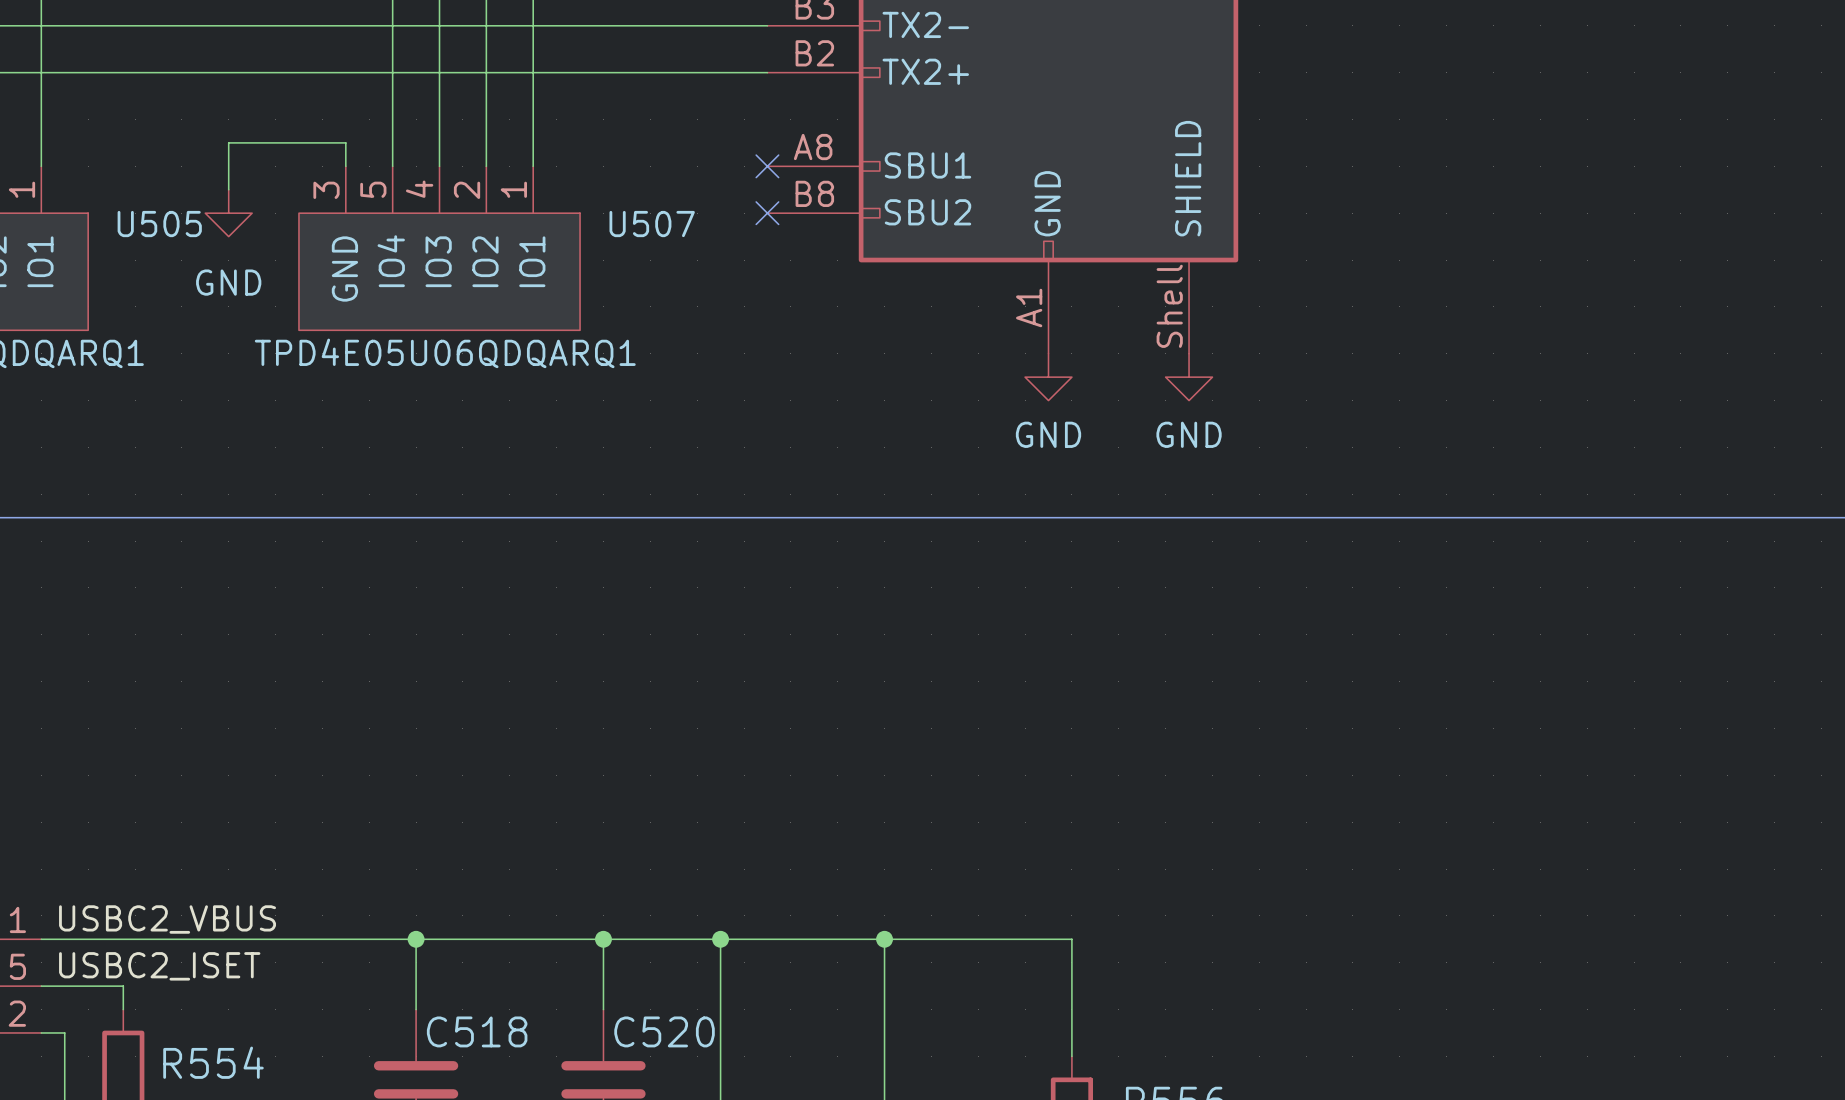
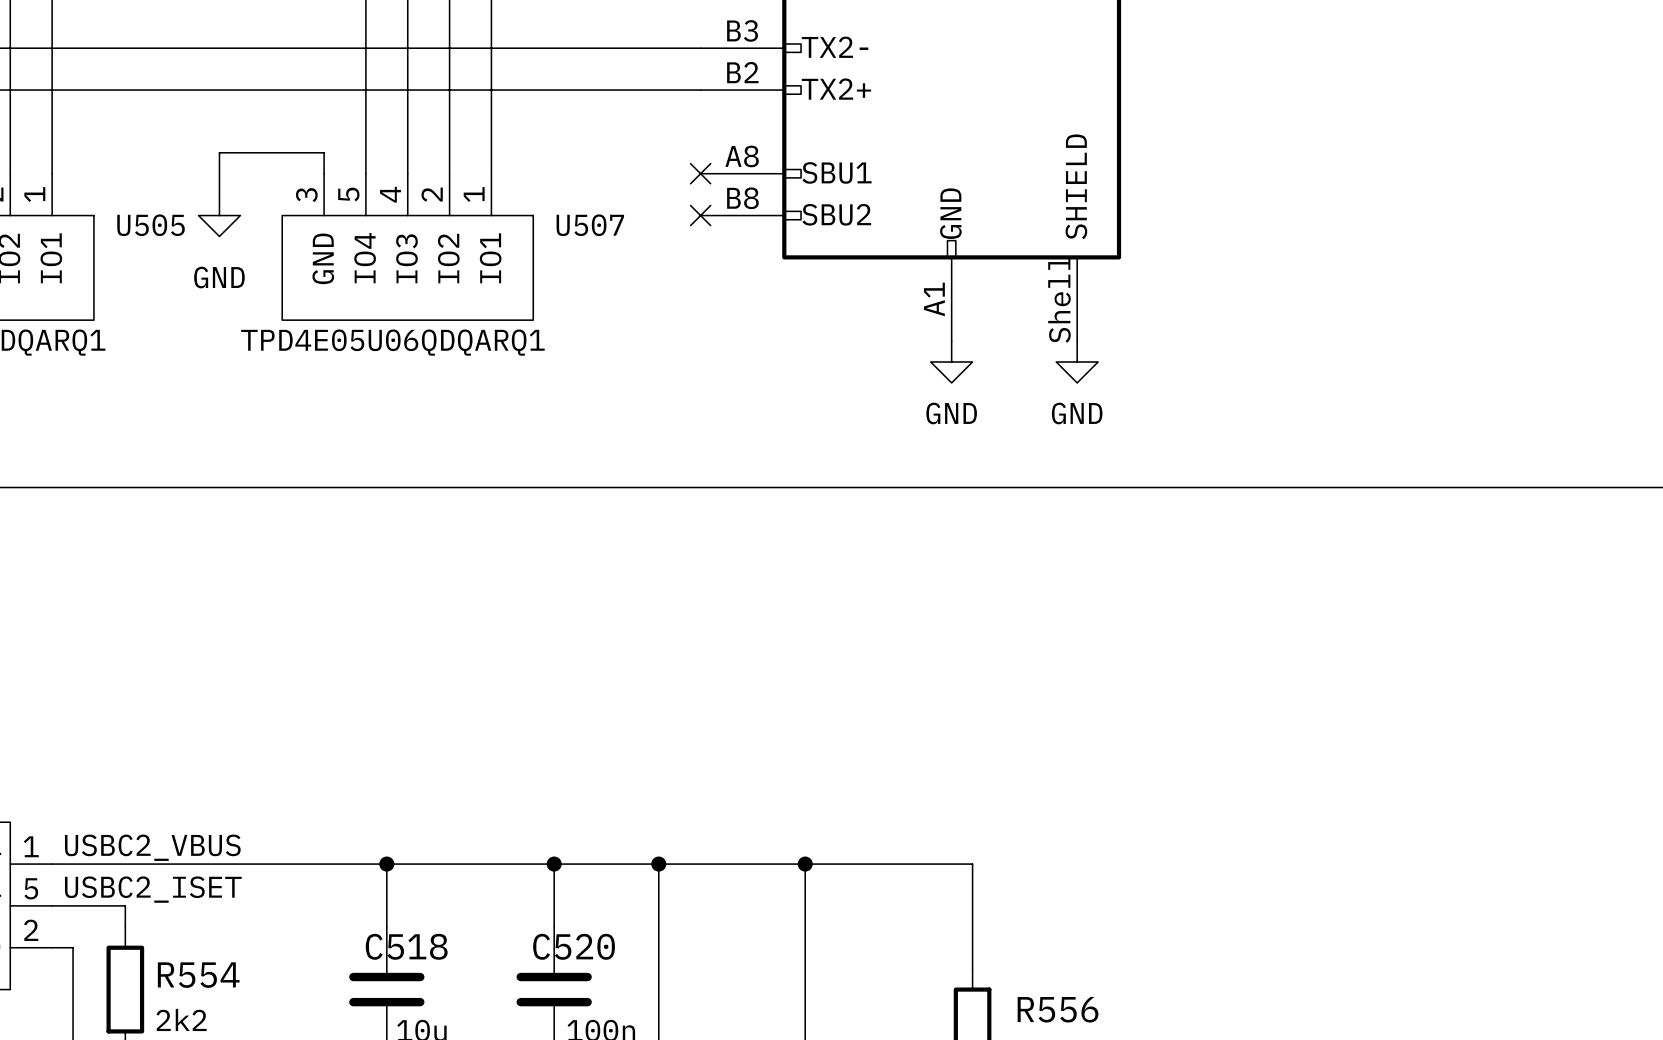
C518 name position: C518 (477, 1031) -> C518 (406, 946)
C520 name position: C520 (664, 1031) -> C520 (574, 946)

